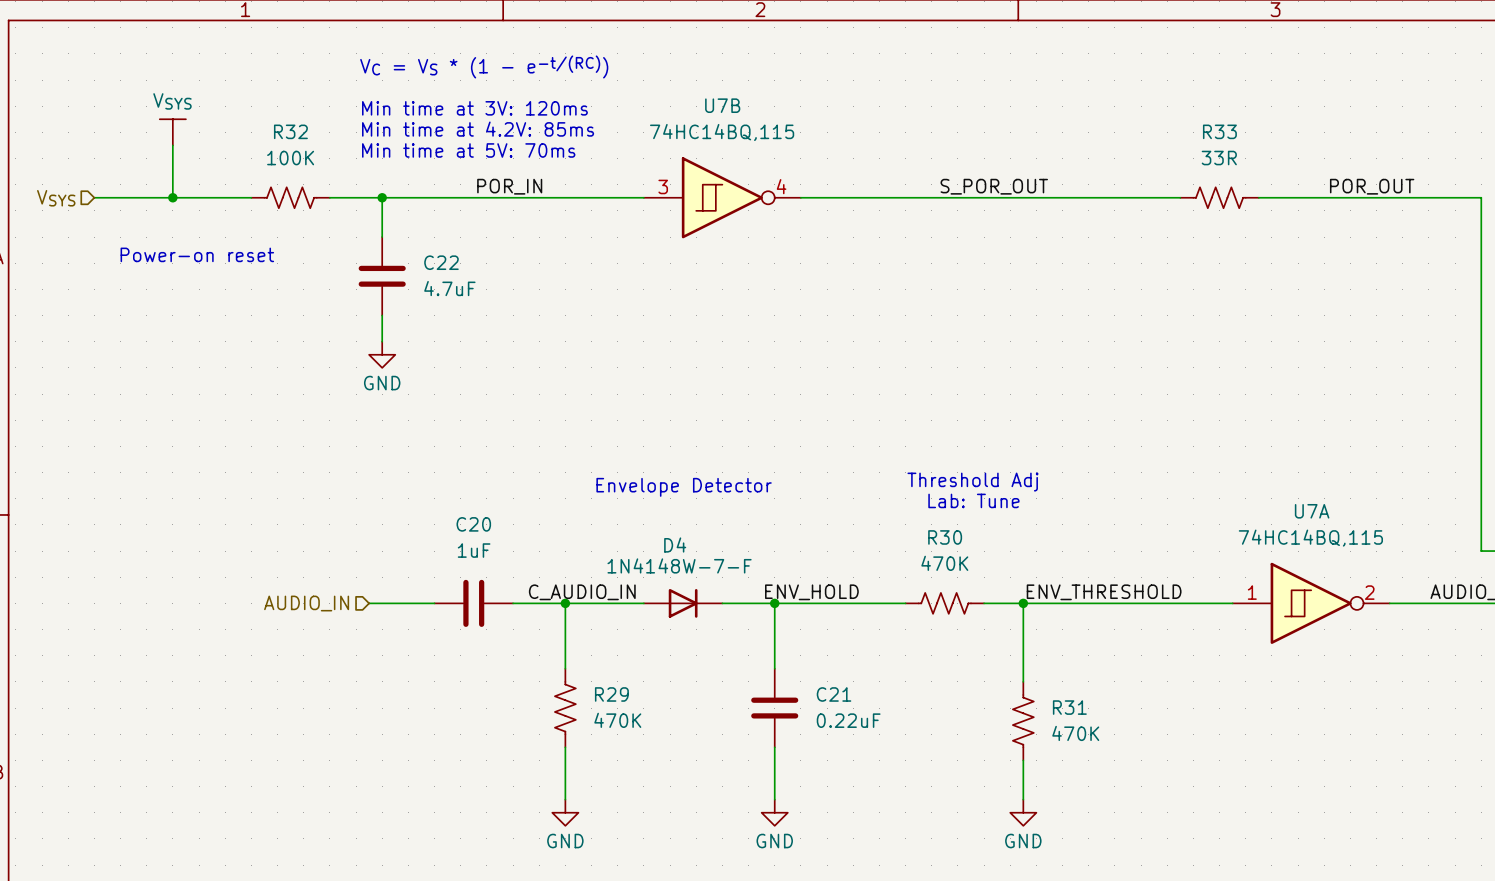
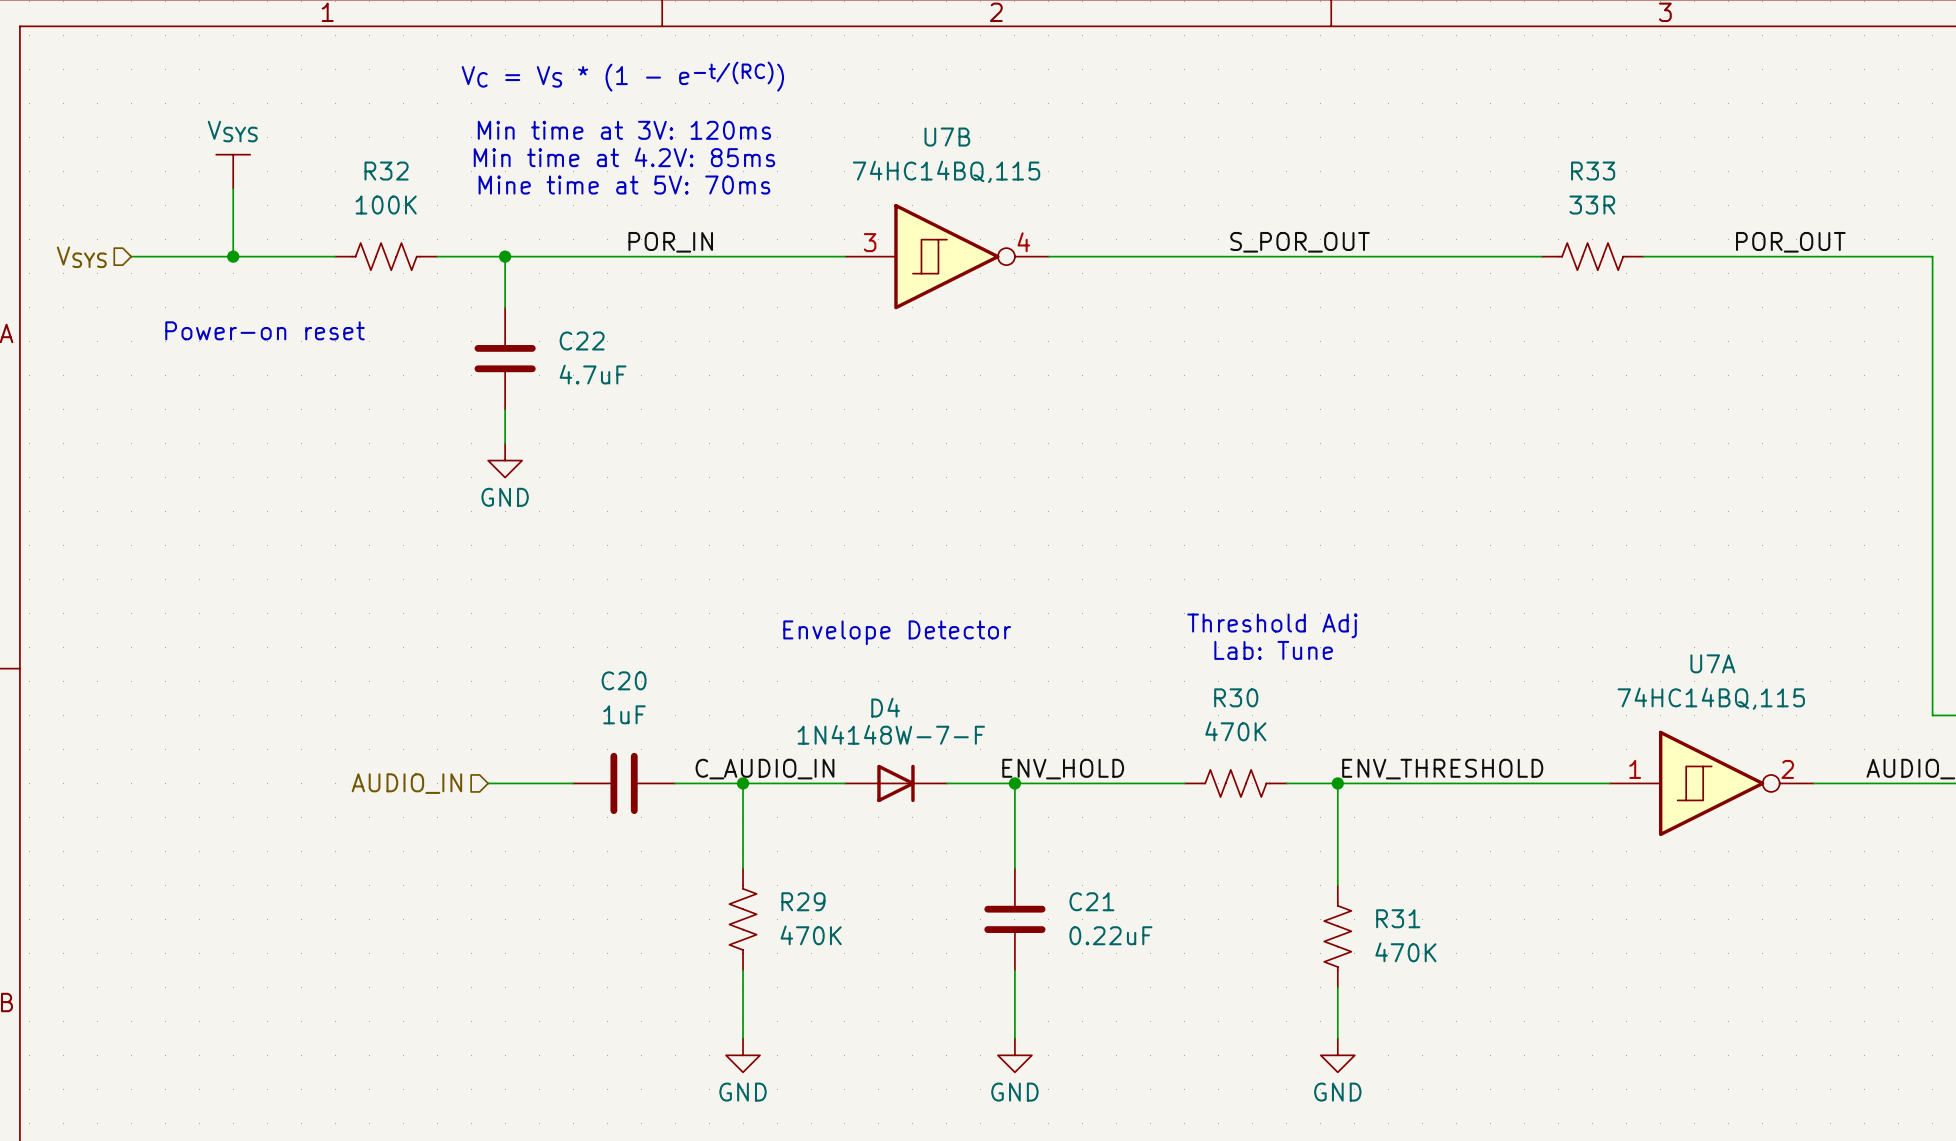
text position: VC = VS * (1 - e-t/(RC)) (484, 66) -> VC = VS * (1 - e-t/(RC)) (622, 76)
text position: Min time at 3V: 120ms (474, 108) -> Min time at 3V: 120ms (624, 130)
text position: Min time at 4.2V: 85ms (478, 129) -> Min time at 4.2V: 85ms (624, 157)
text: Min time at 5V: 70ms (468, 150) -> Mine time at 5V: 70ms (624, 185)

